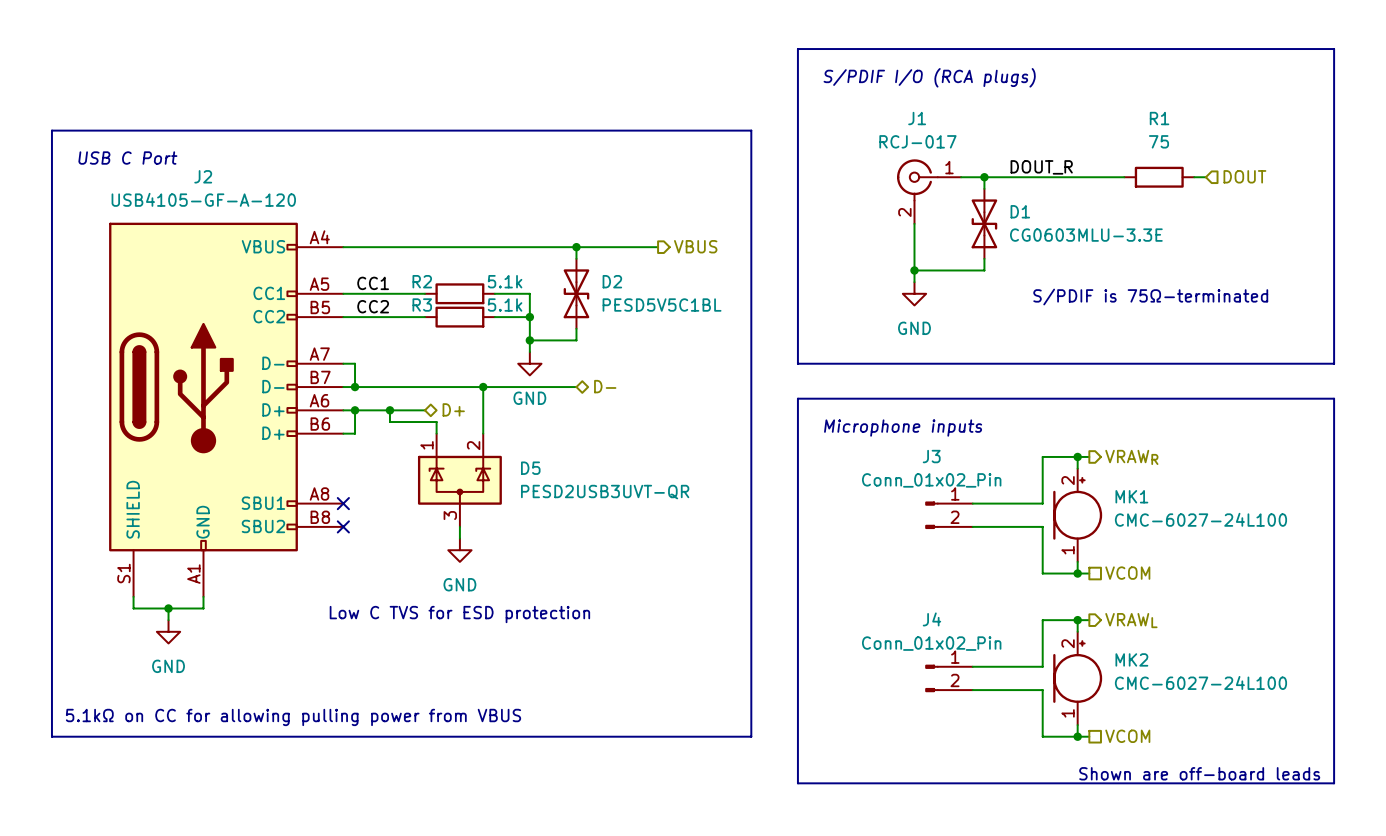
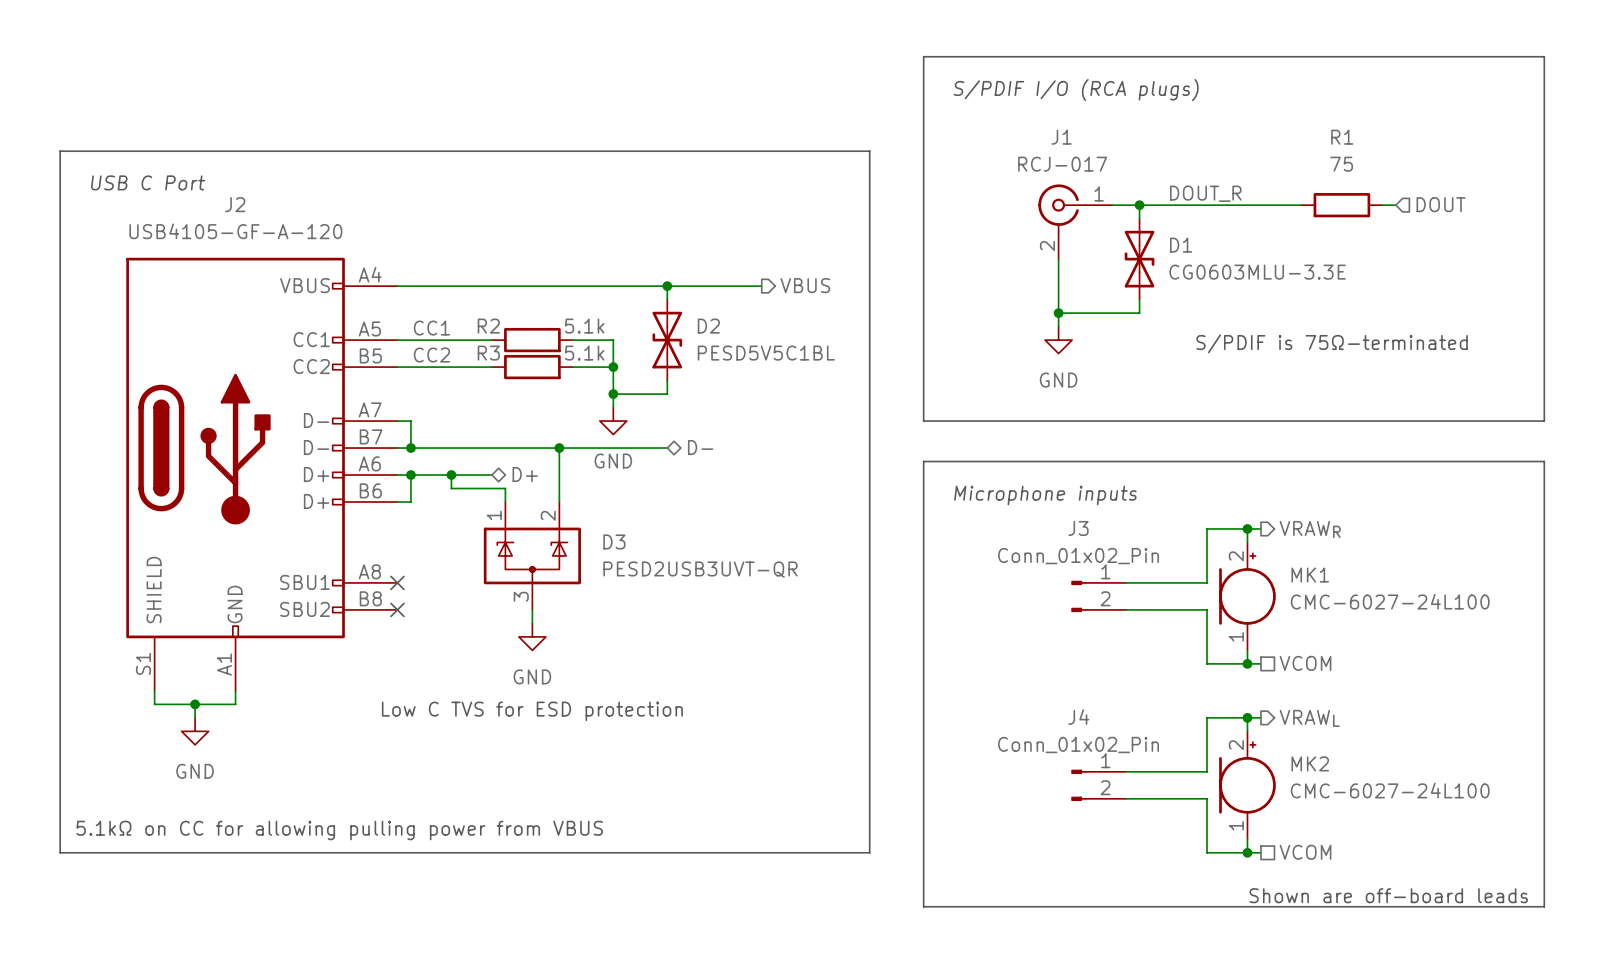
D5 name: D5 (530, 468) -> D3 (614, 541)

